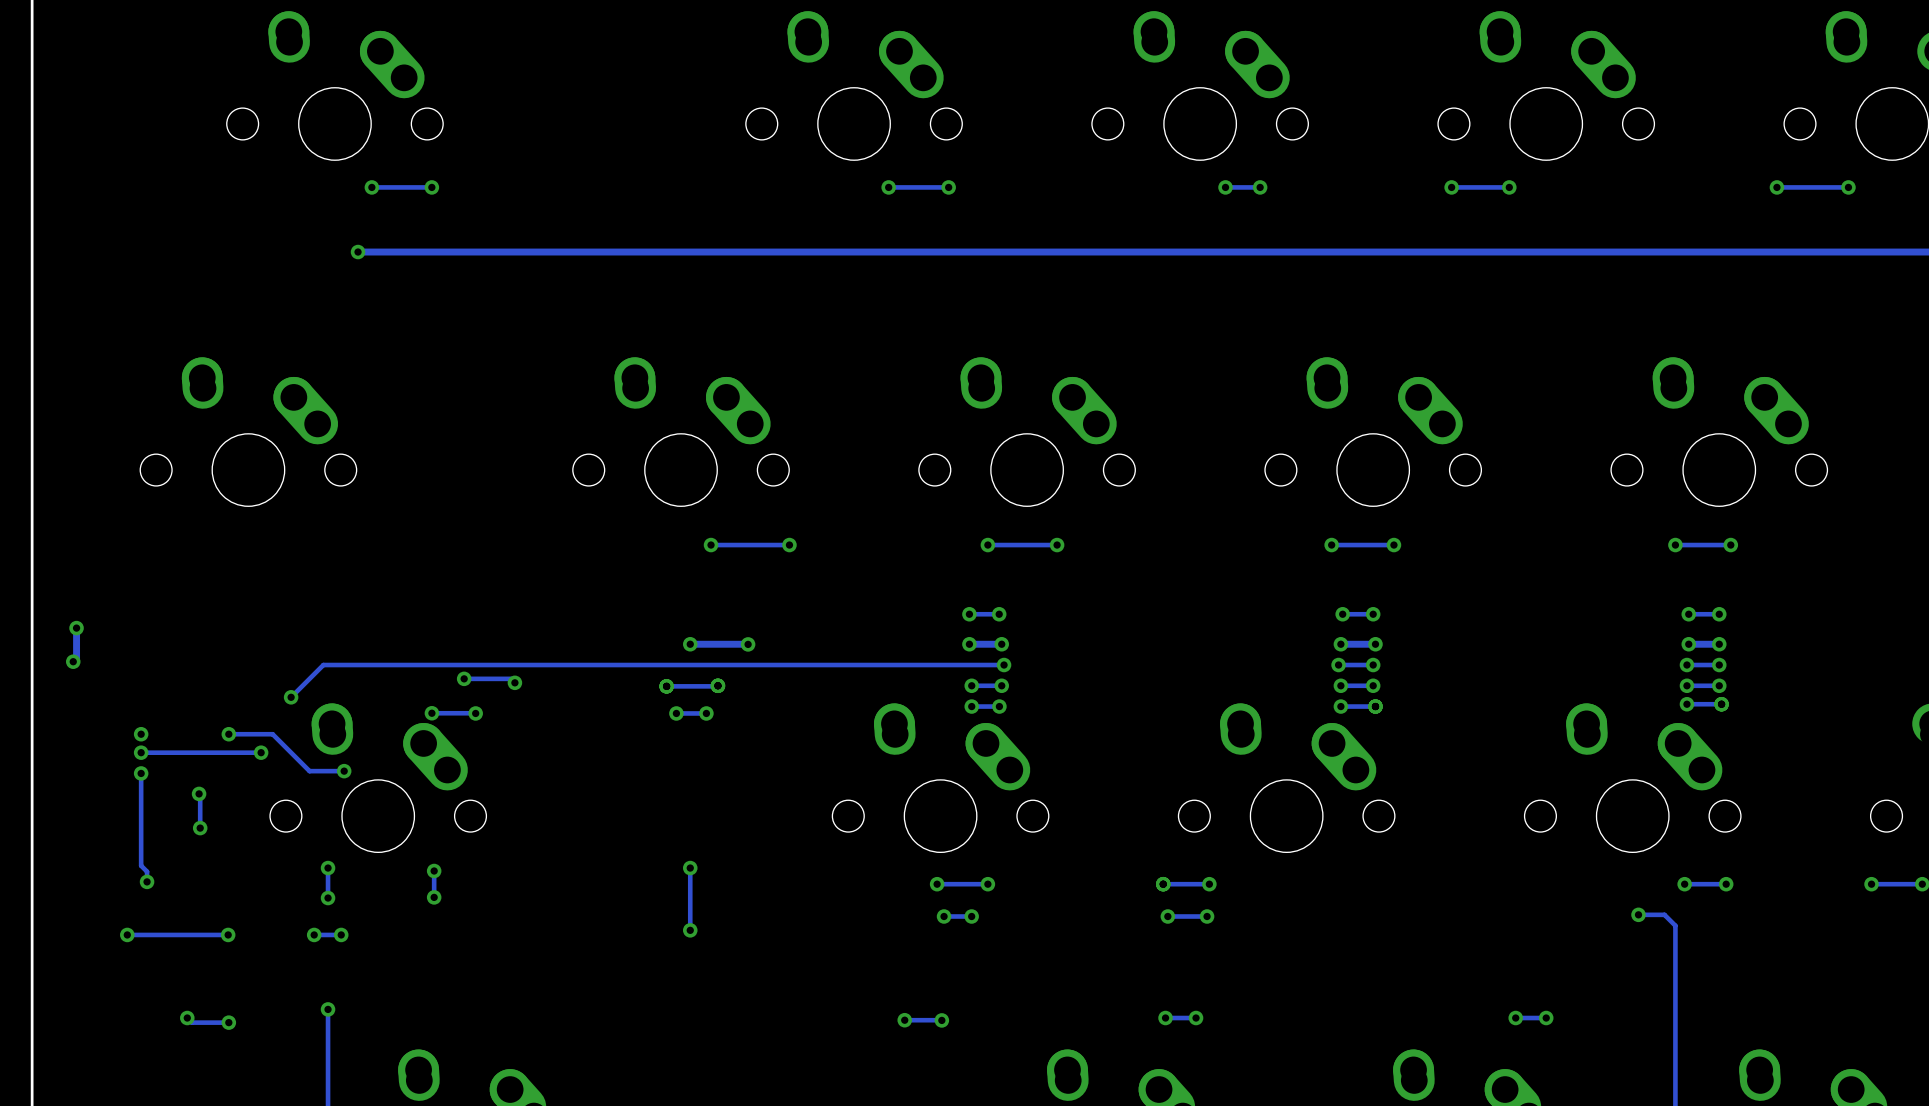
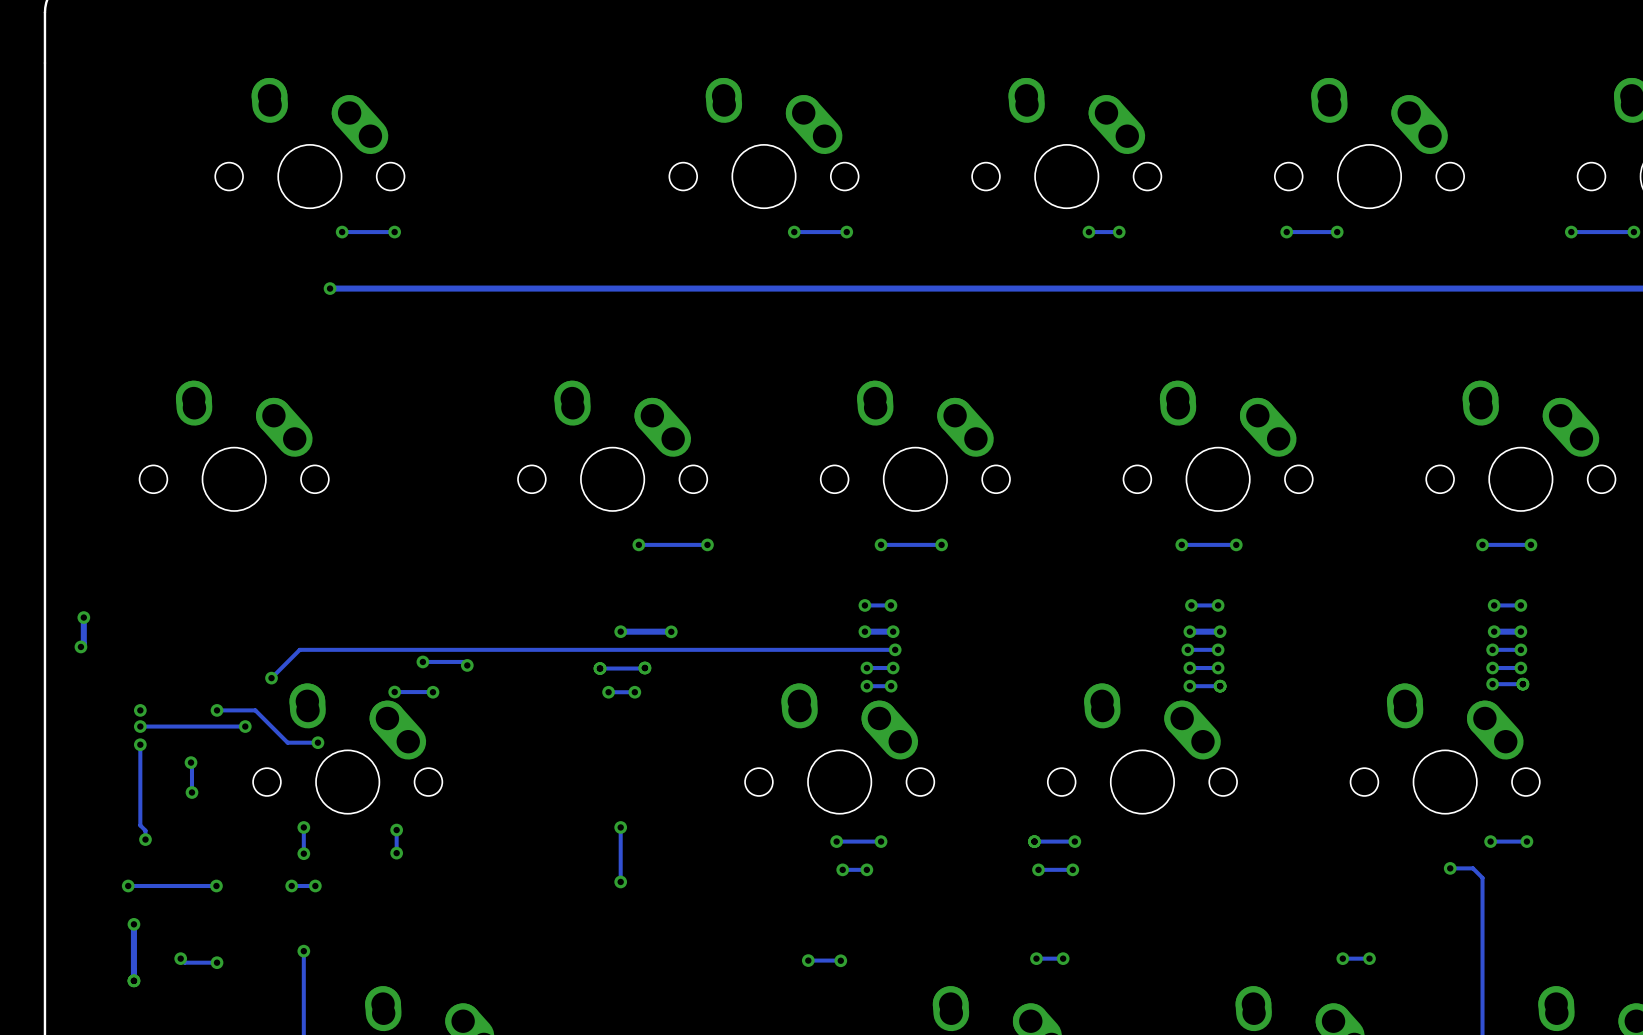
track: none -> (133, 924) (133, 980)
via: none -> (133, 924)
via: none -> (133, 980)

